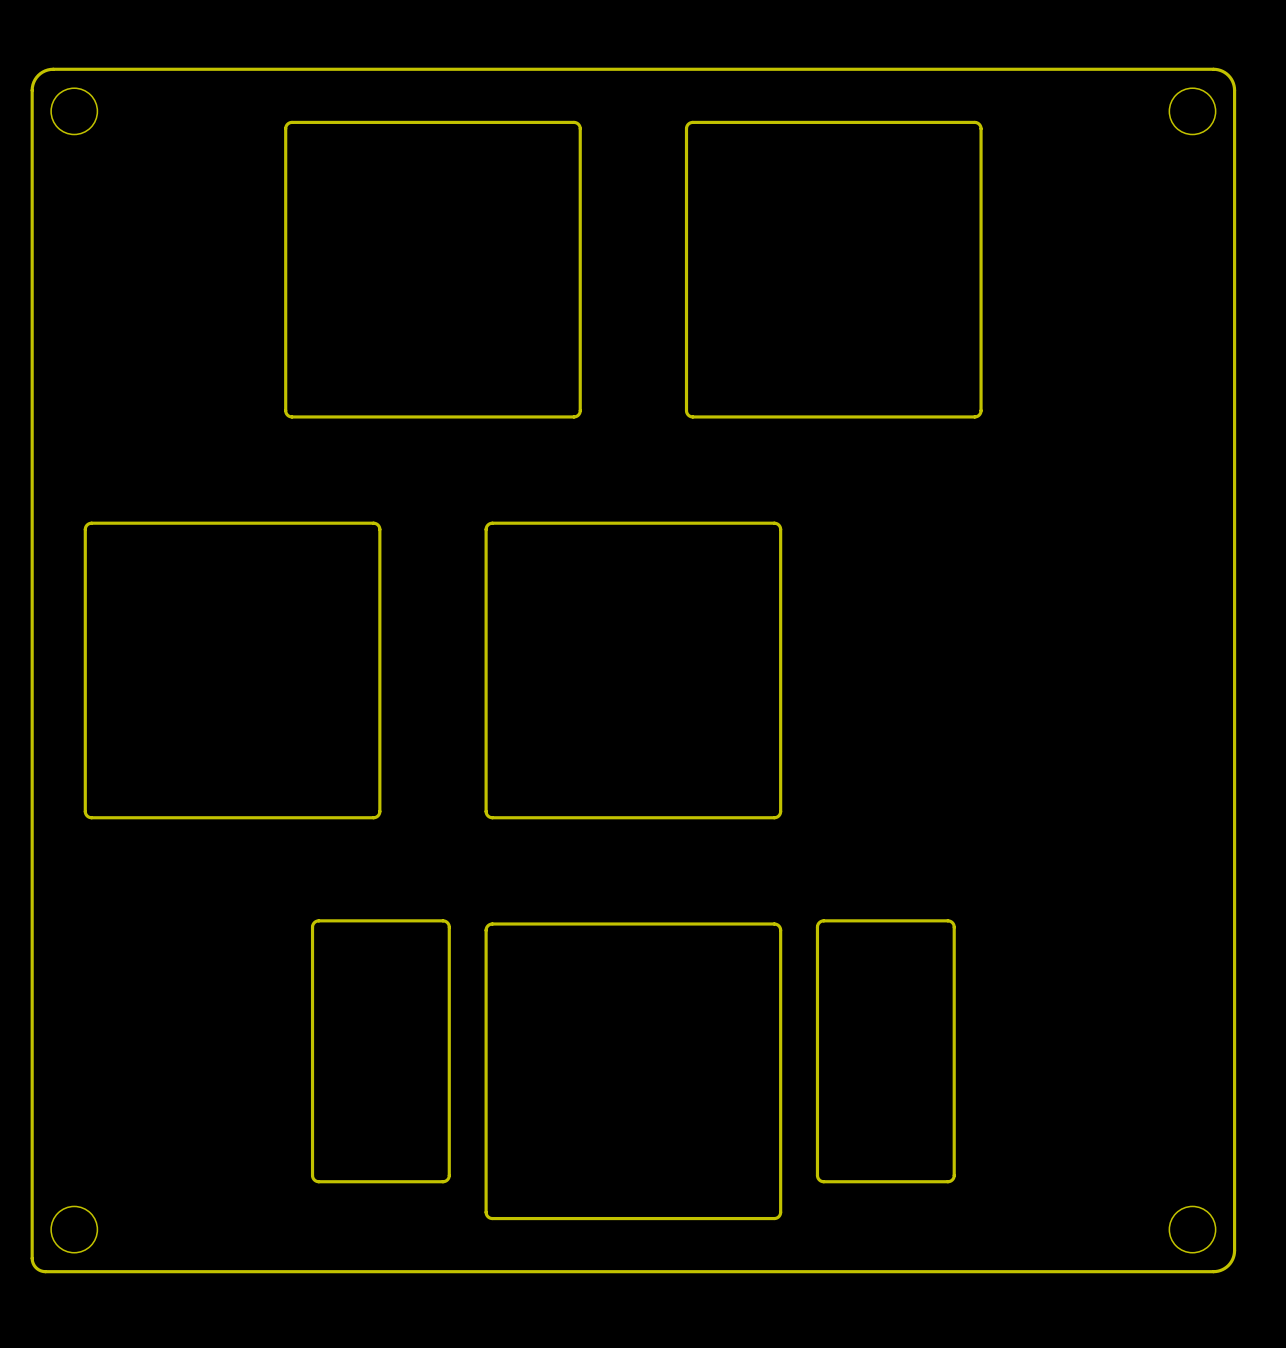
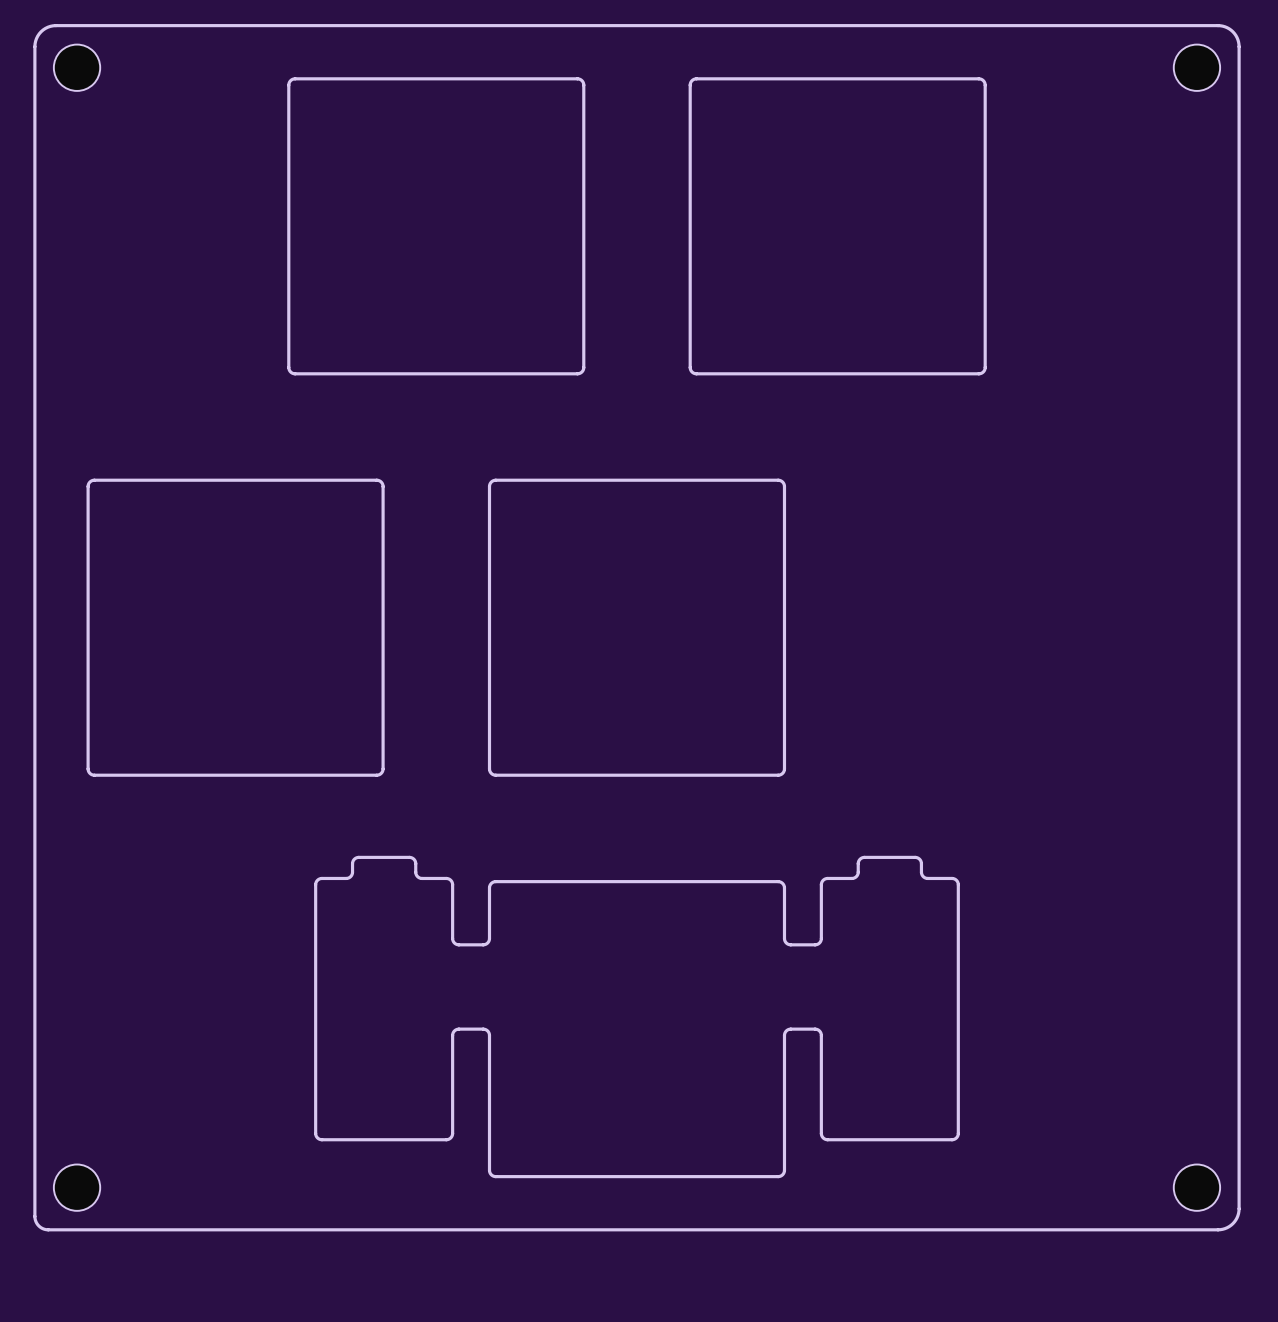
drawing shape: [310, 919, 956, 1221] -> [314, 855, 960, 1179]

